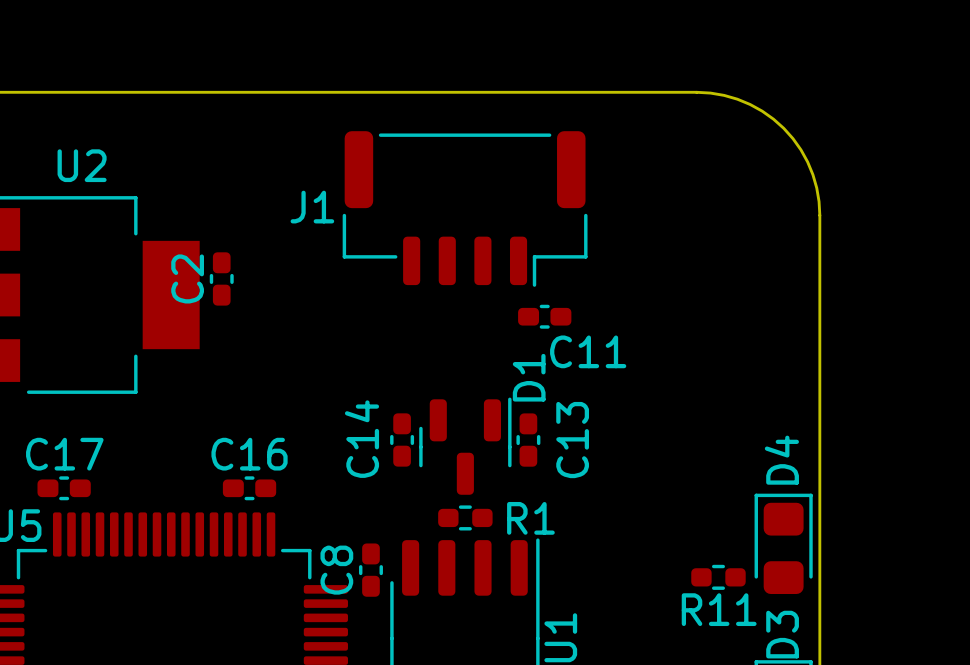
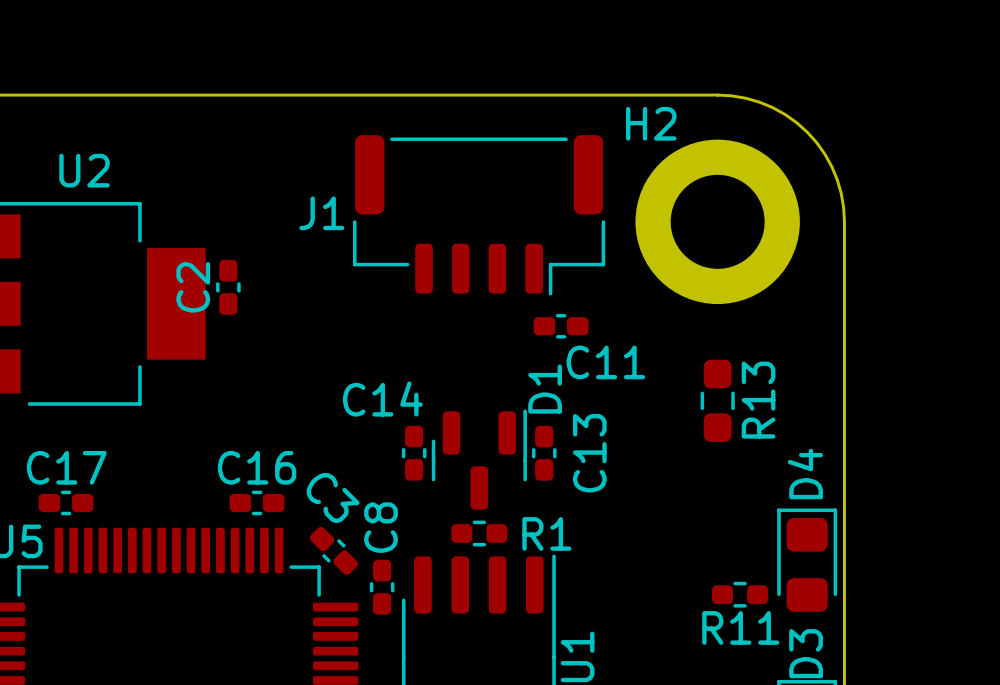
H2: none -> (717, 221)
R13: none -> (717, 400)
C14 name rotation: 0° (361, 439) -> 90° clockwise (382, 399)
C3: none -> (333, 550)
C8 name position: C8 (336, 570) -> C8 (381, 527)

